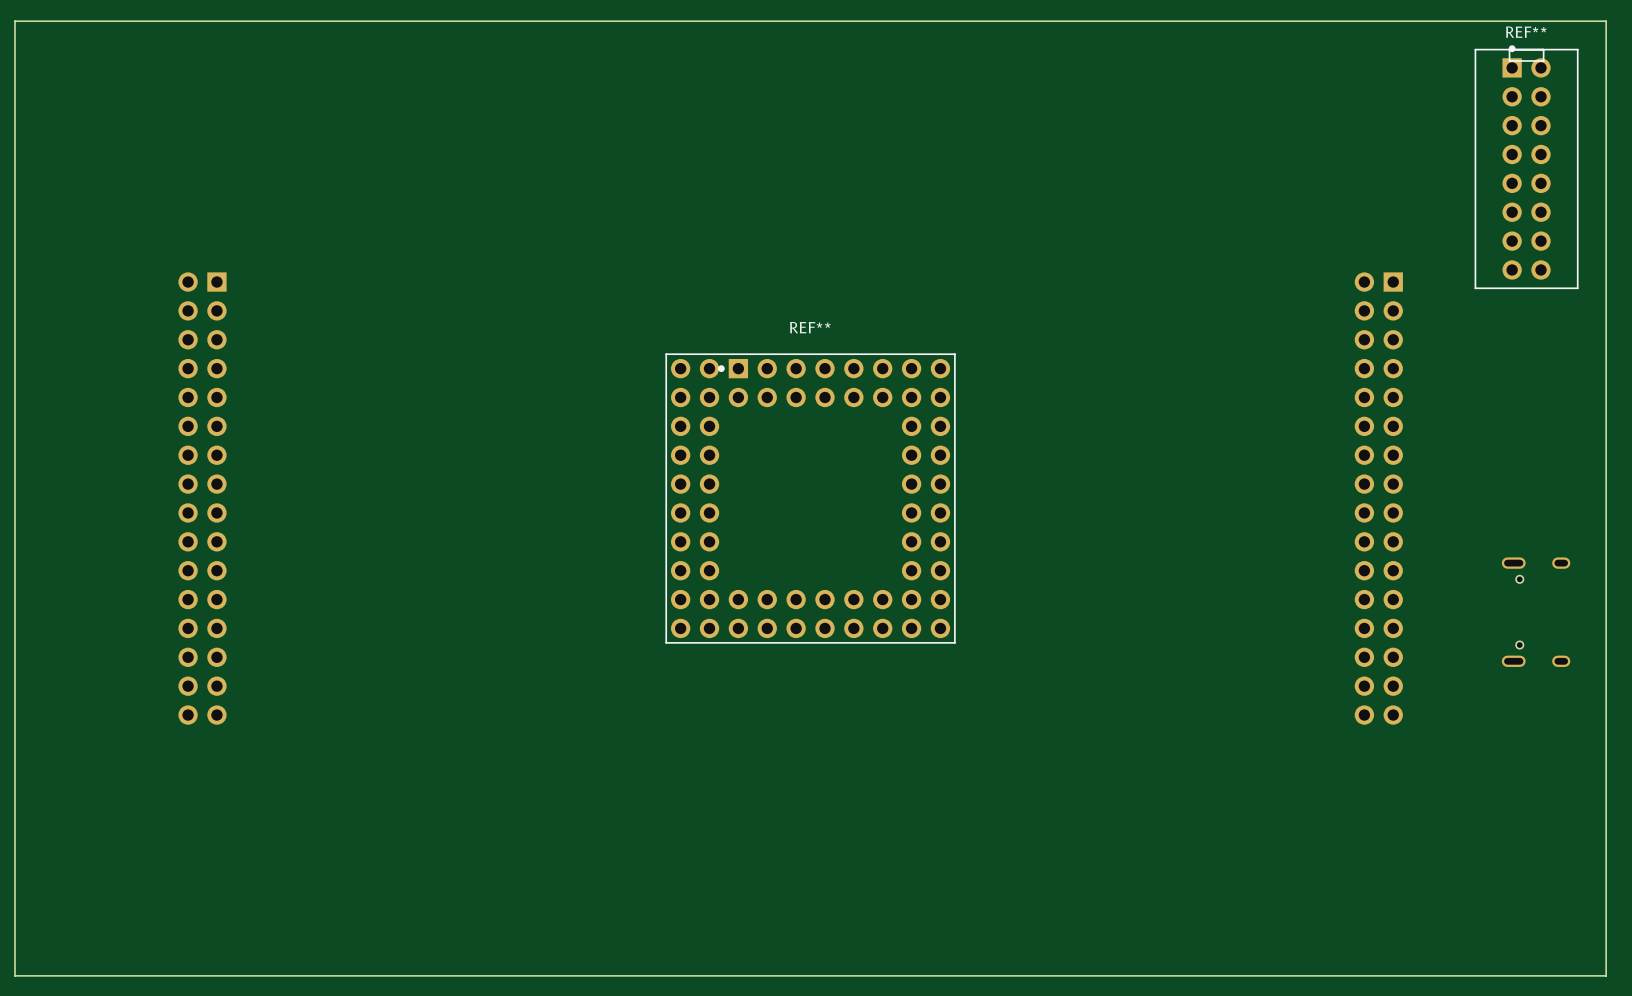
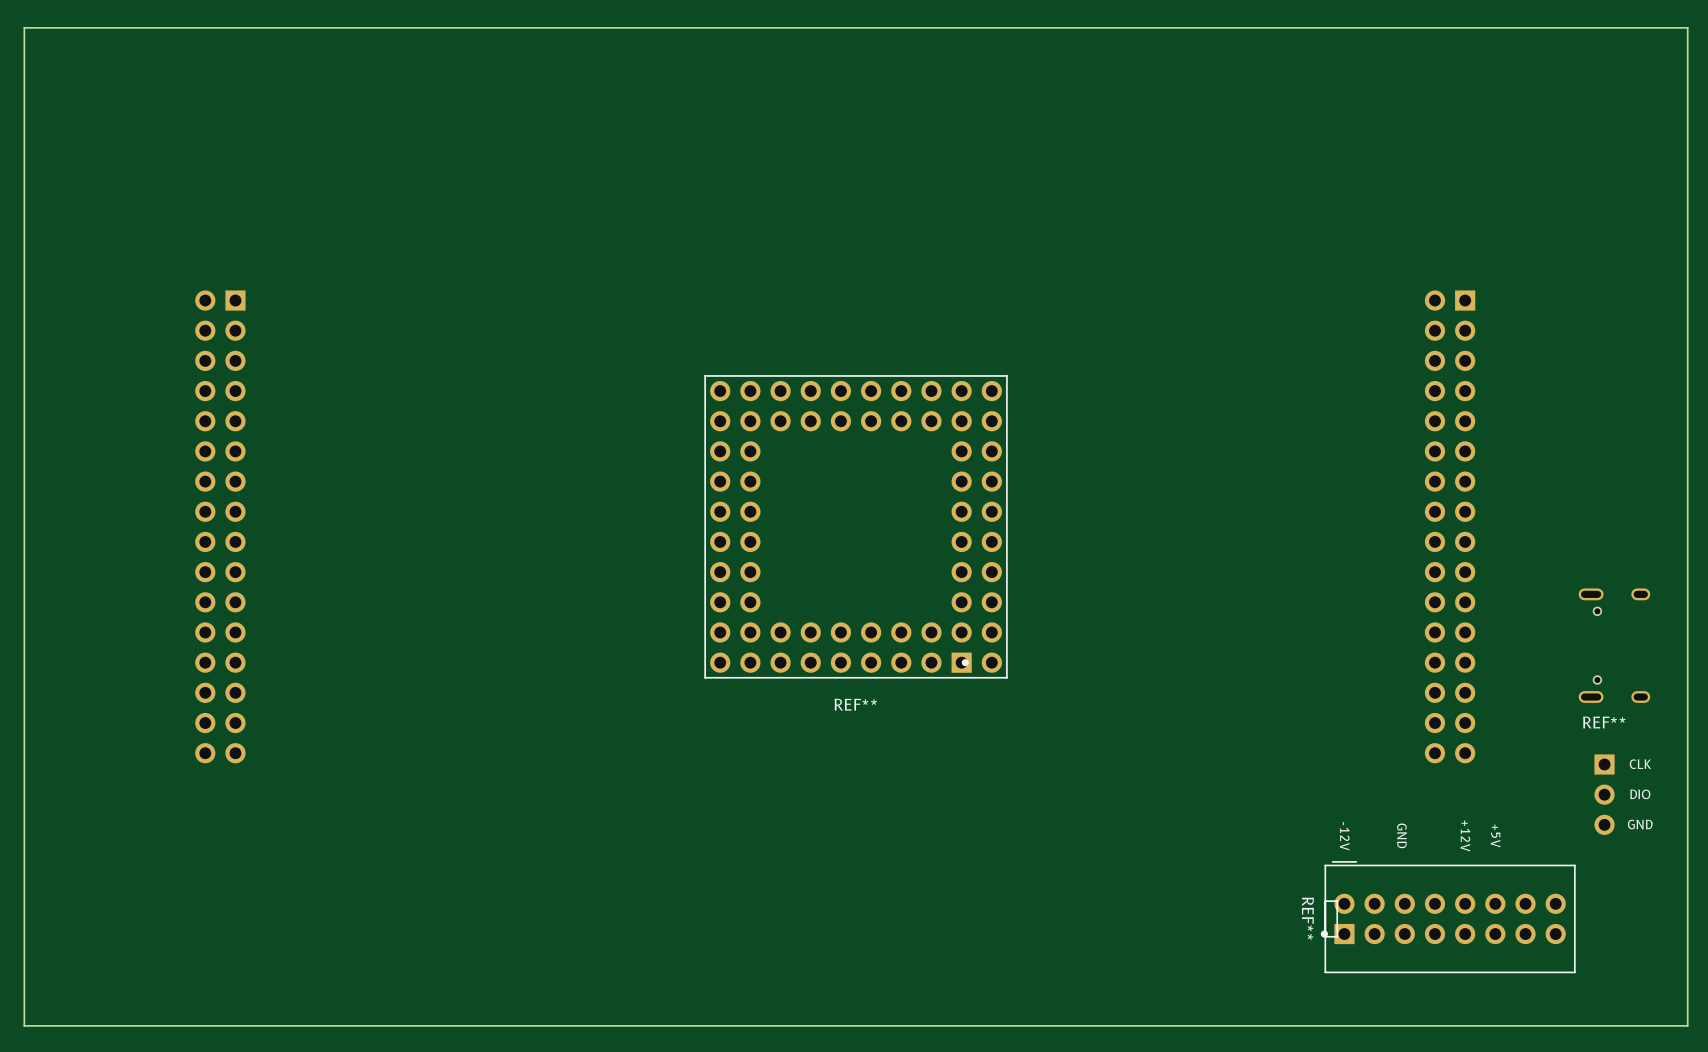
REF**: (1526, 167) -> none
REF** name position: REF** (810, 327) -> REF** (855, 704)
REF** footprint: [665, 353, 956, 644] -> [704, 375, 1008, 679]
REF**: none -> (1604, 794)
REF**: none -> (1448, 917)

